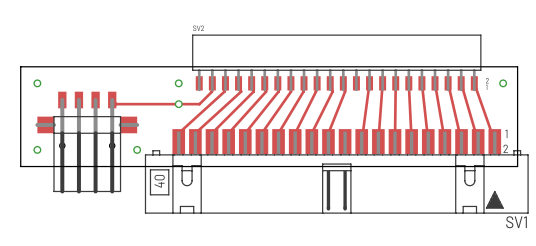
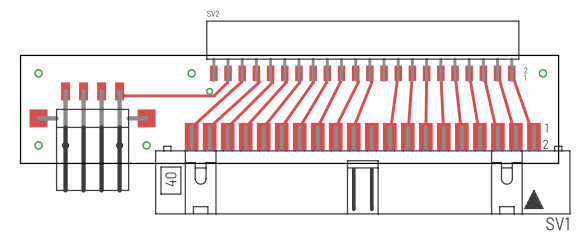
part footprint: [35, 91, 140, 194] -> [29, 82, 156, 193]
via: none -> (209, 91)
via: (178, 104) -> none

